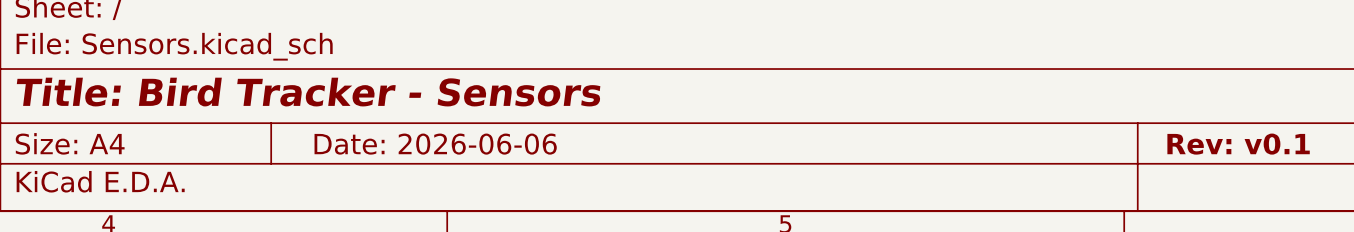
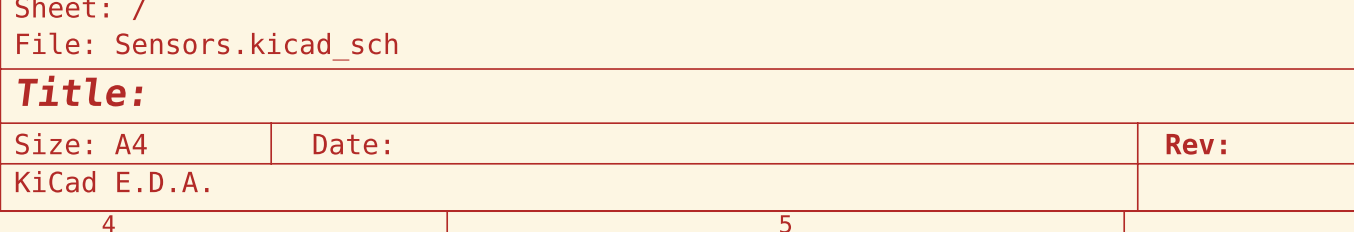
title block: Title: Bird Tracker - Sensors (308, 92) -> Title: (80, 91)
title block: Date: 2026-06-06 (435, 144) -> Date: (351, 144)
title block: Rev: v0.1 (1238, 144) -> Rev: (1196, 144)

